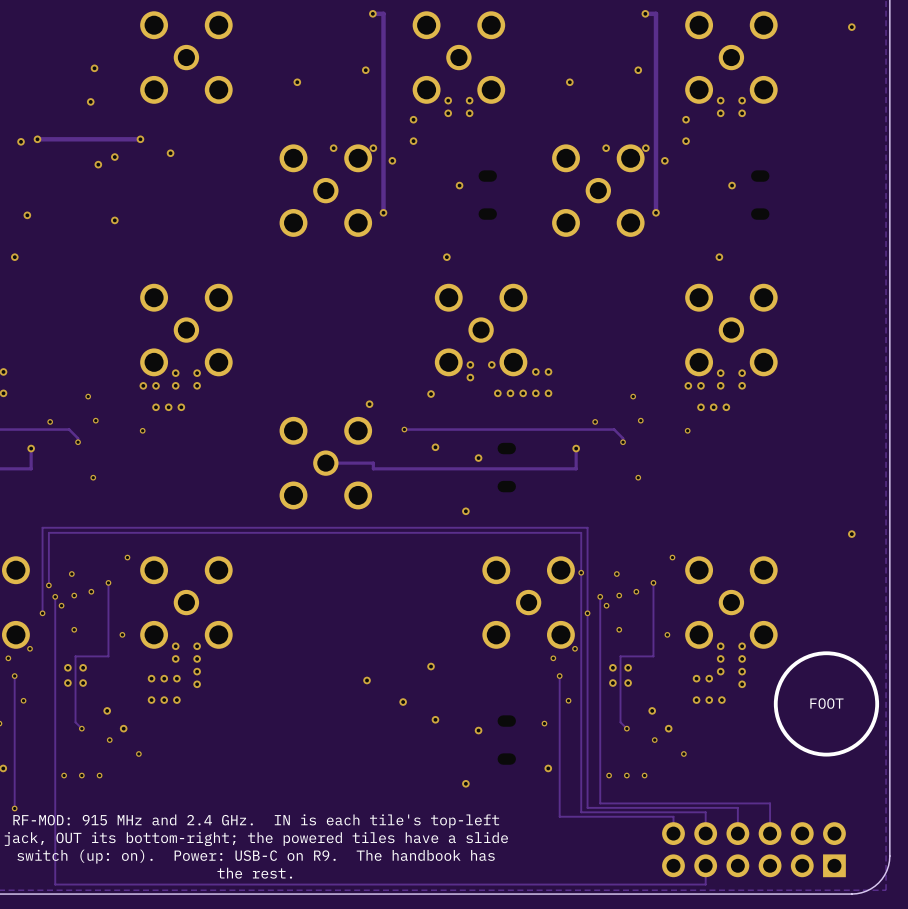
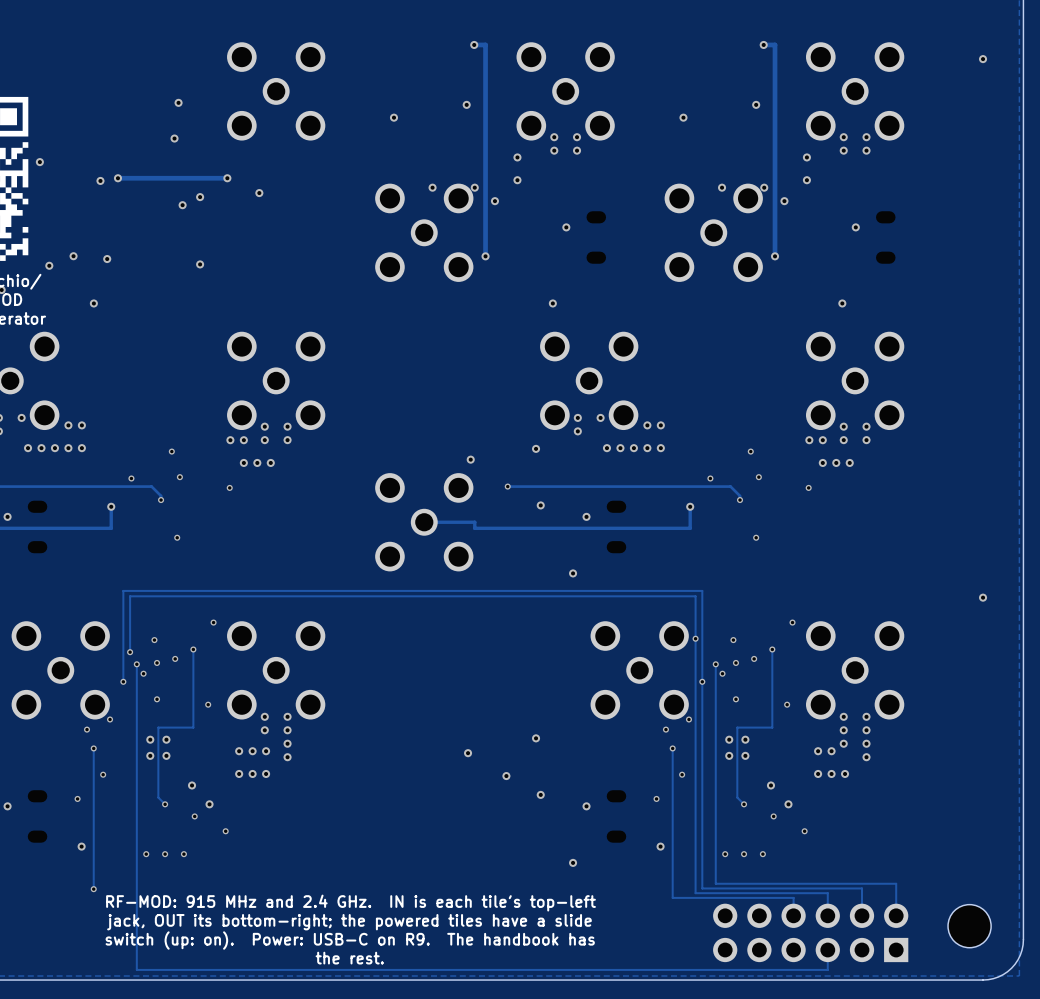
drawing: [773, 651, 880, 757] -> none
text: FOOT (826, 703) -> none
part: none -> (969, 926)
part position: (753, 849) -> (810, 932)

